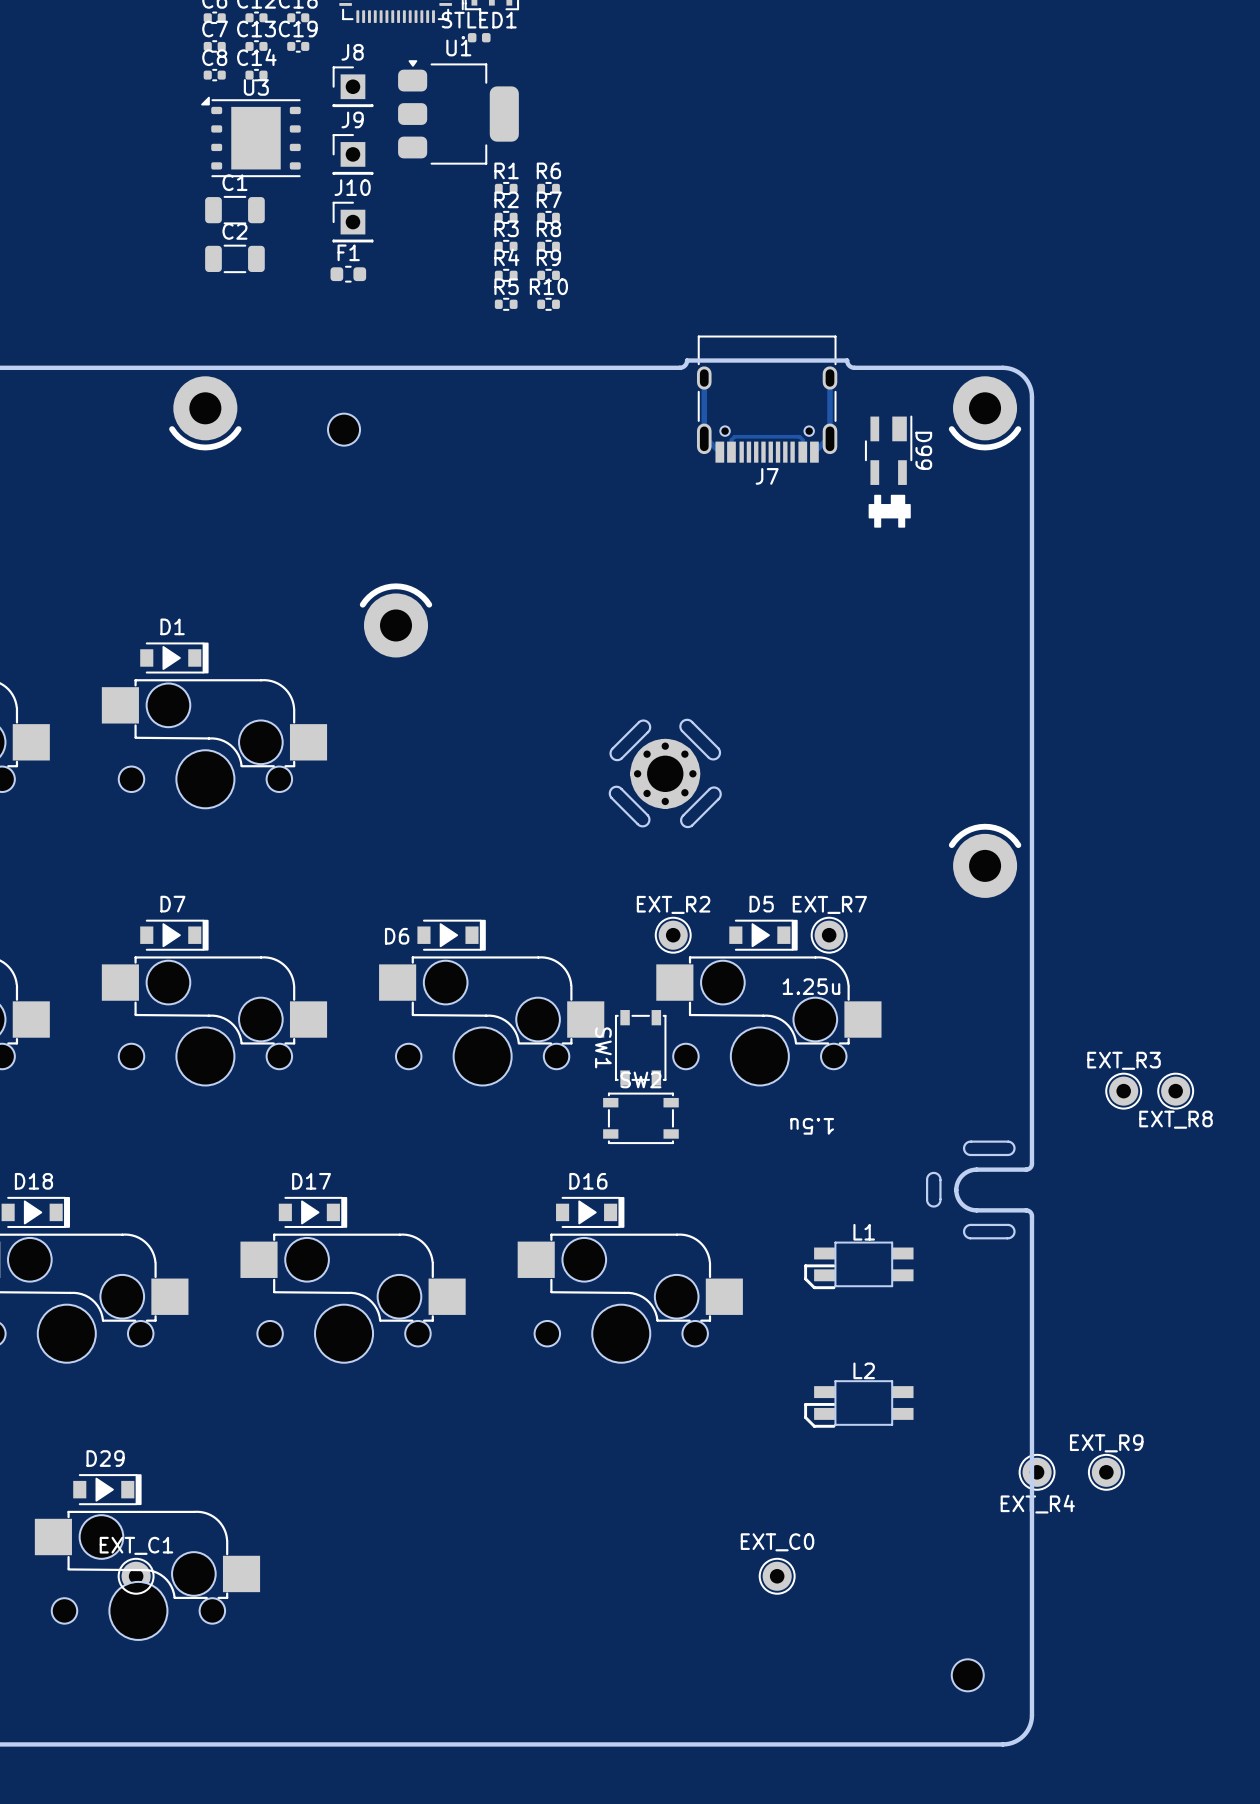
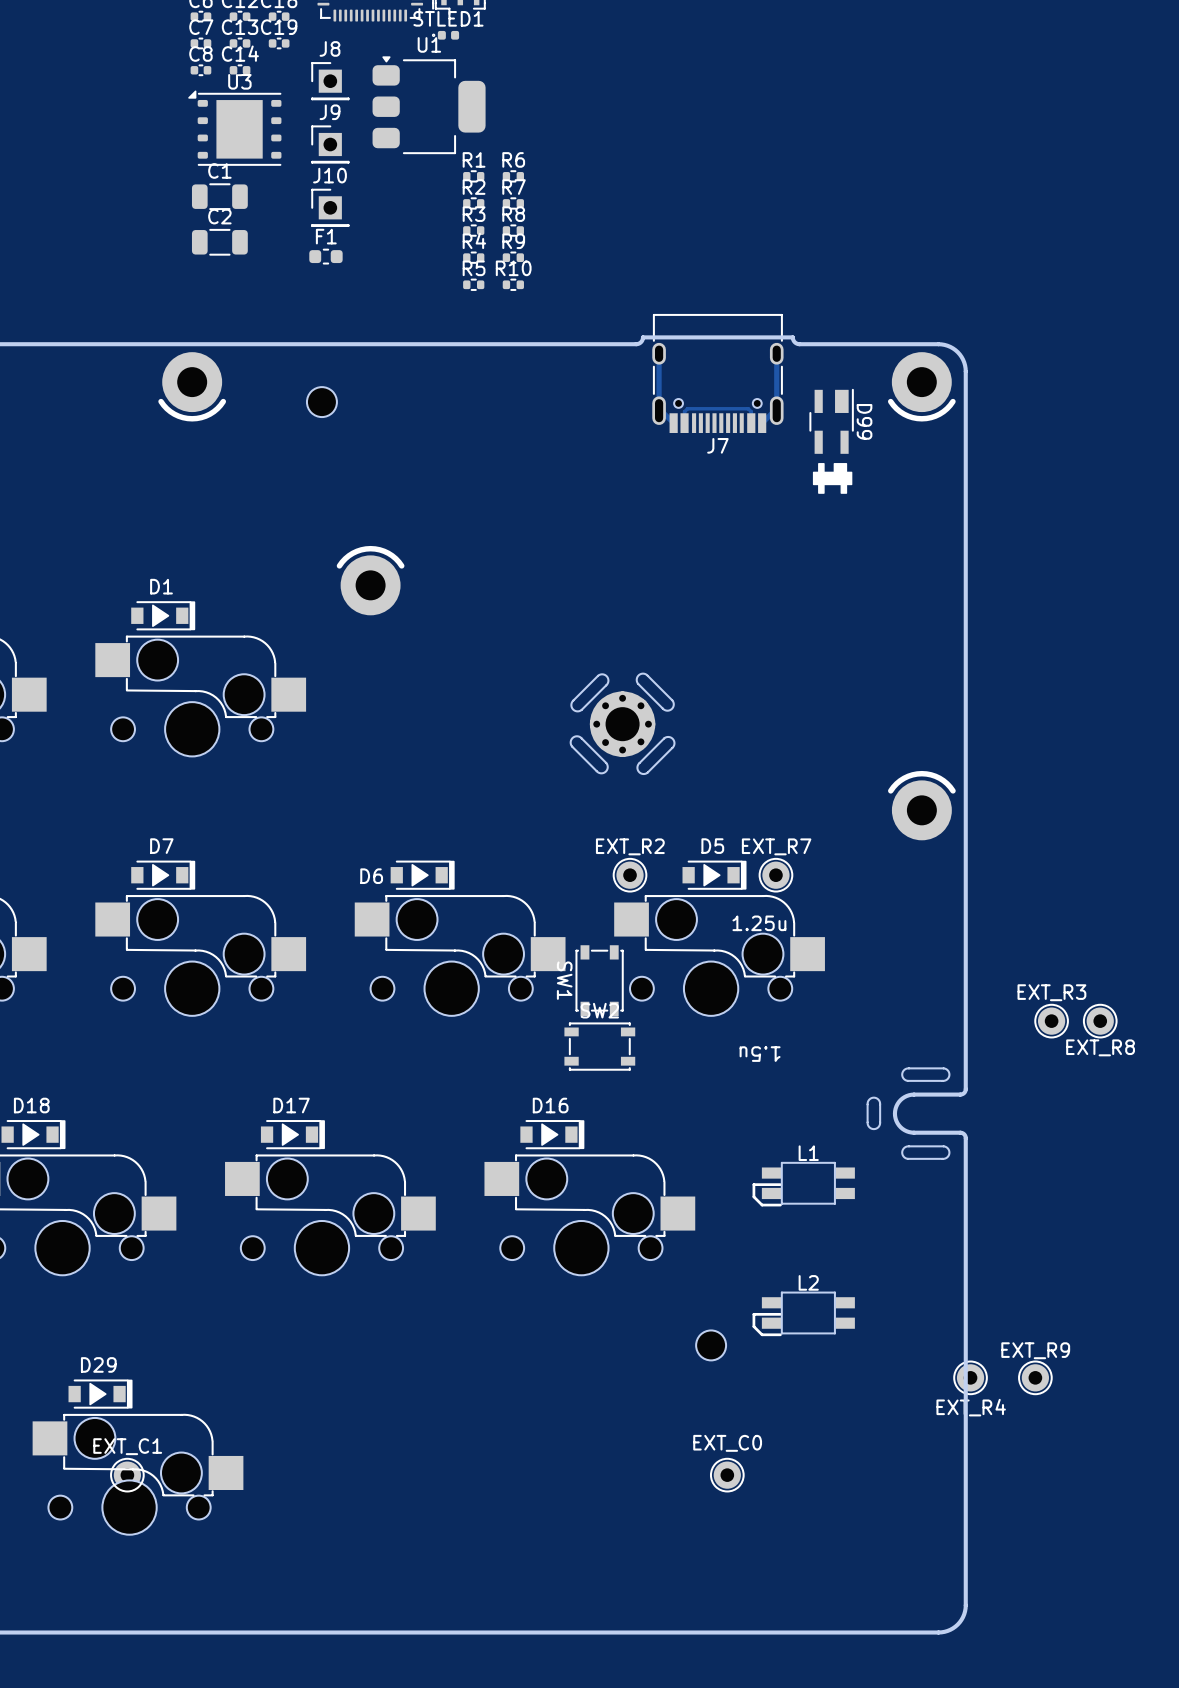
part position: (967, 1675) -> (711, 1345)

